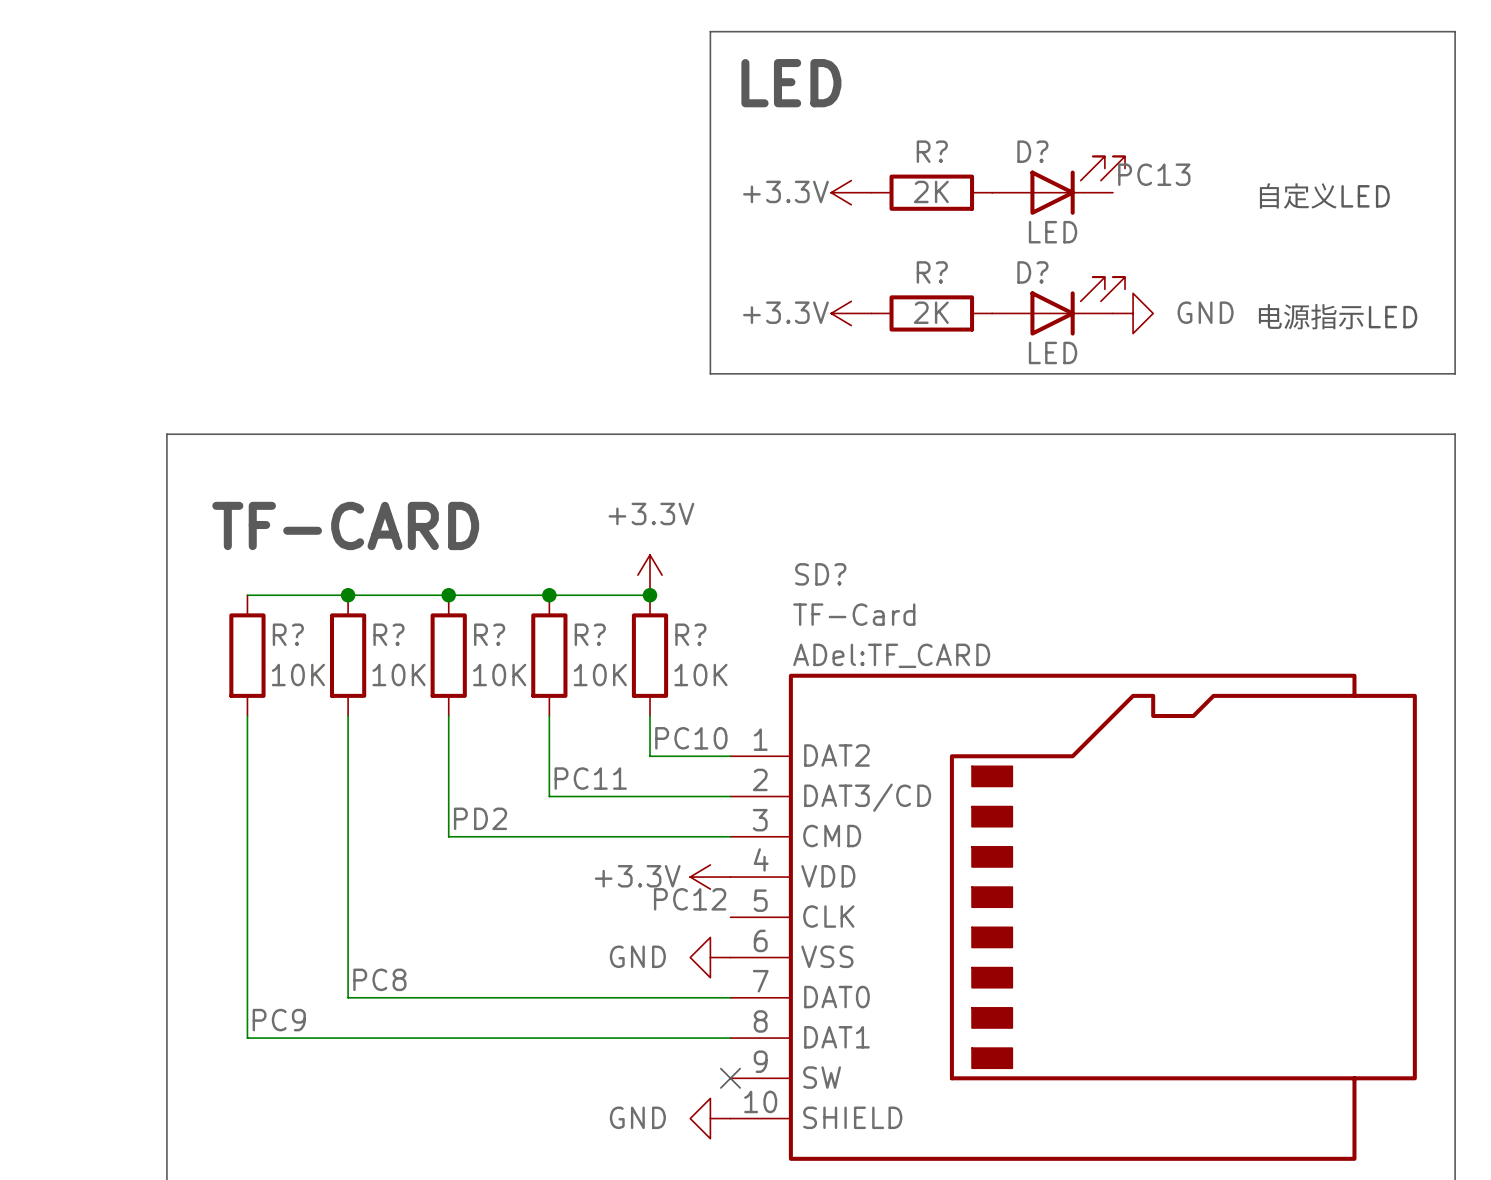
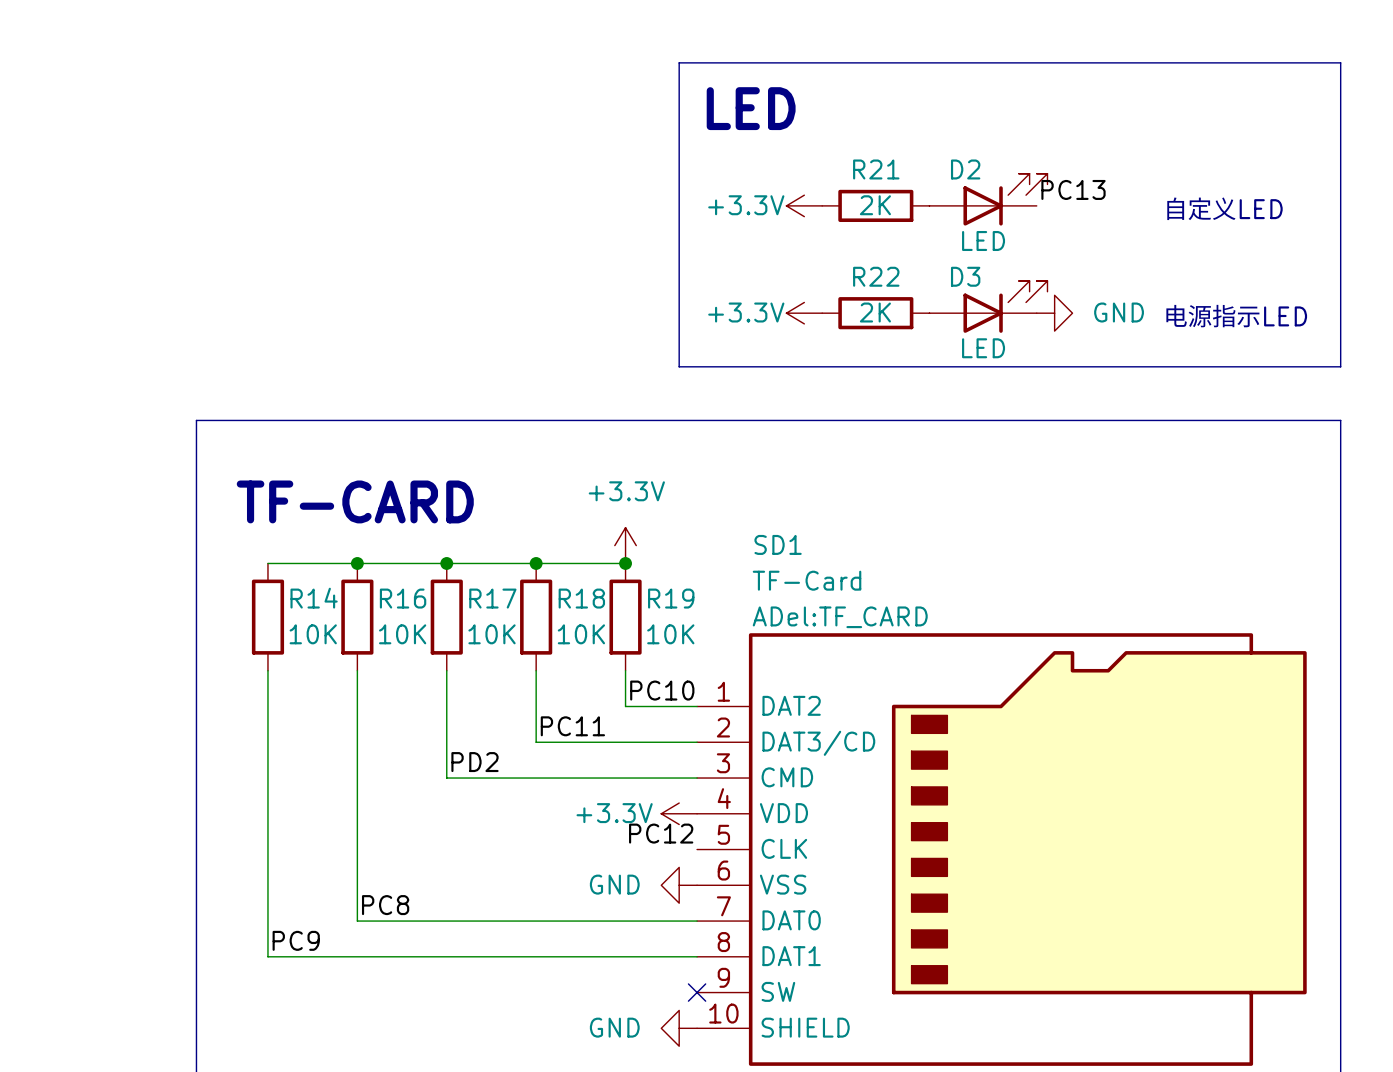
R? name: R? (932, 151) -> R21 (876, 169)
D? name: D? (1032, 151) -> D2 (965, 169)
R? name: R? (932, 272) -> R22 (876, 276)
D? name: D? (1032, 272) -> D3 (965, 276)
SD? name: SD? (820, 574) -> SD1 (778, 544)
R? name: R? (288, 634) -> R14 (314, 598)
R? name: R? (388, 634) -> R16 (403, 598)
R? name: R? (489, 634) -> R17 (492, 598)
R? name: R? (590, 634) -> R18 (581, 598)
R? name: R? (690, 634) -> R19 (671, 598)

